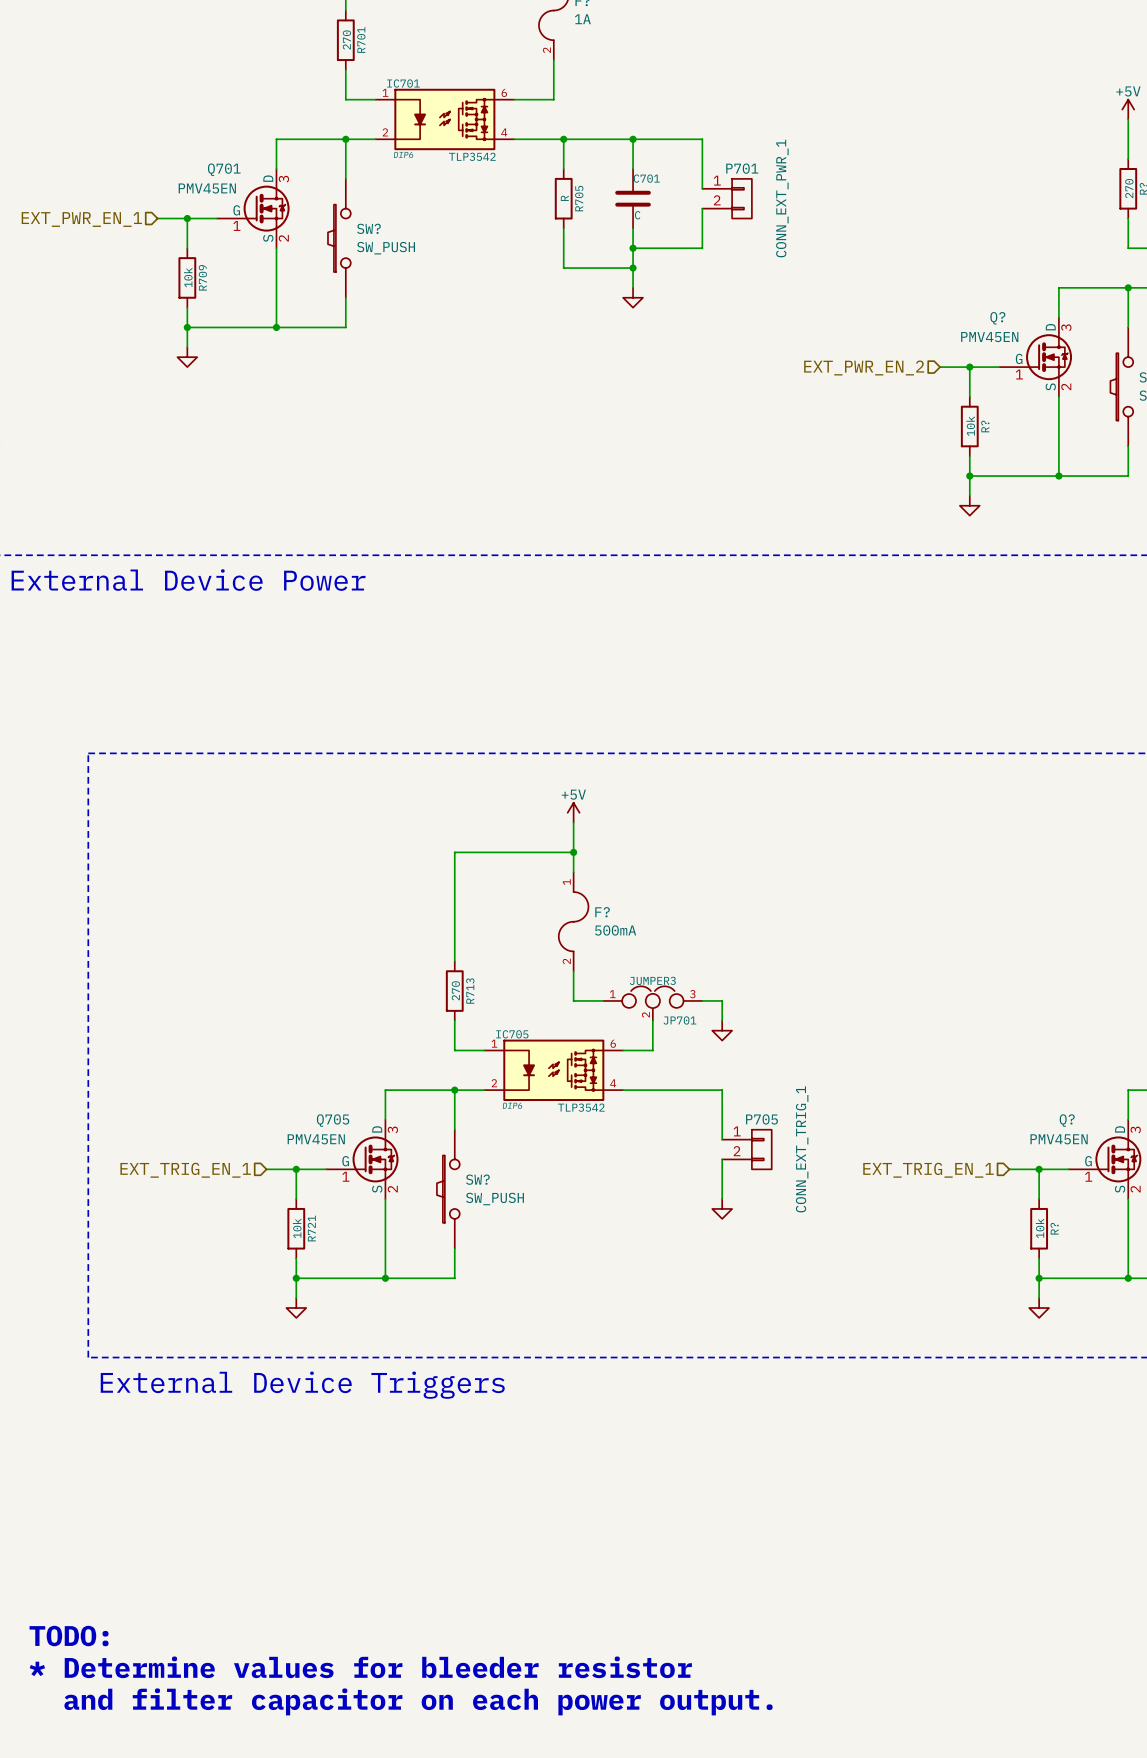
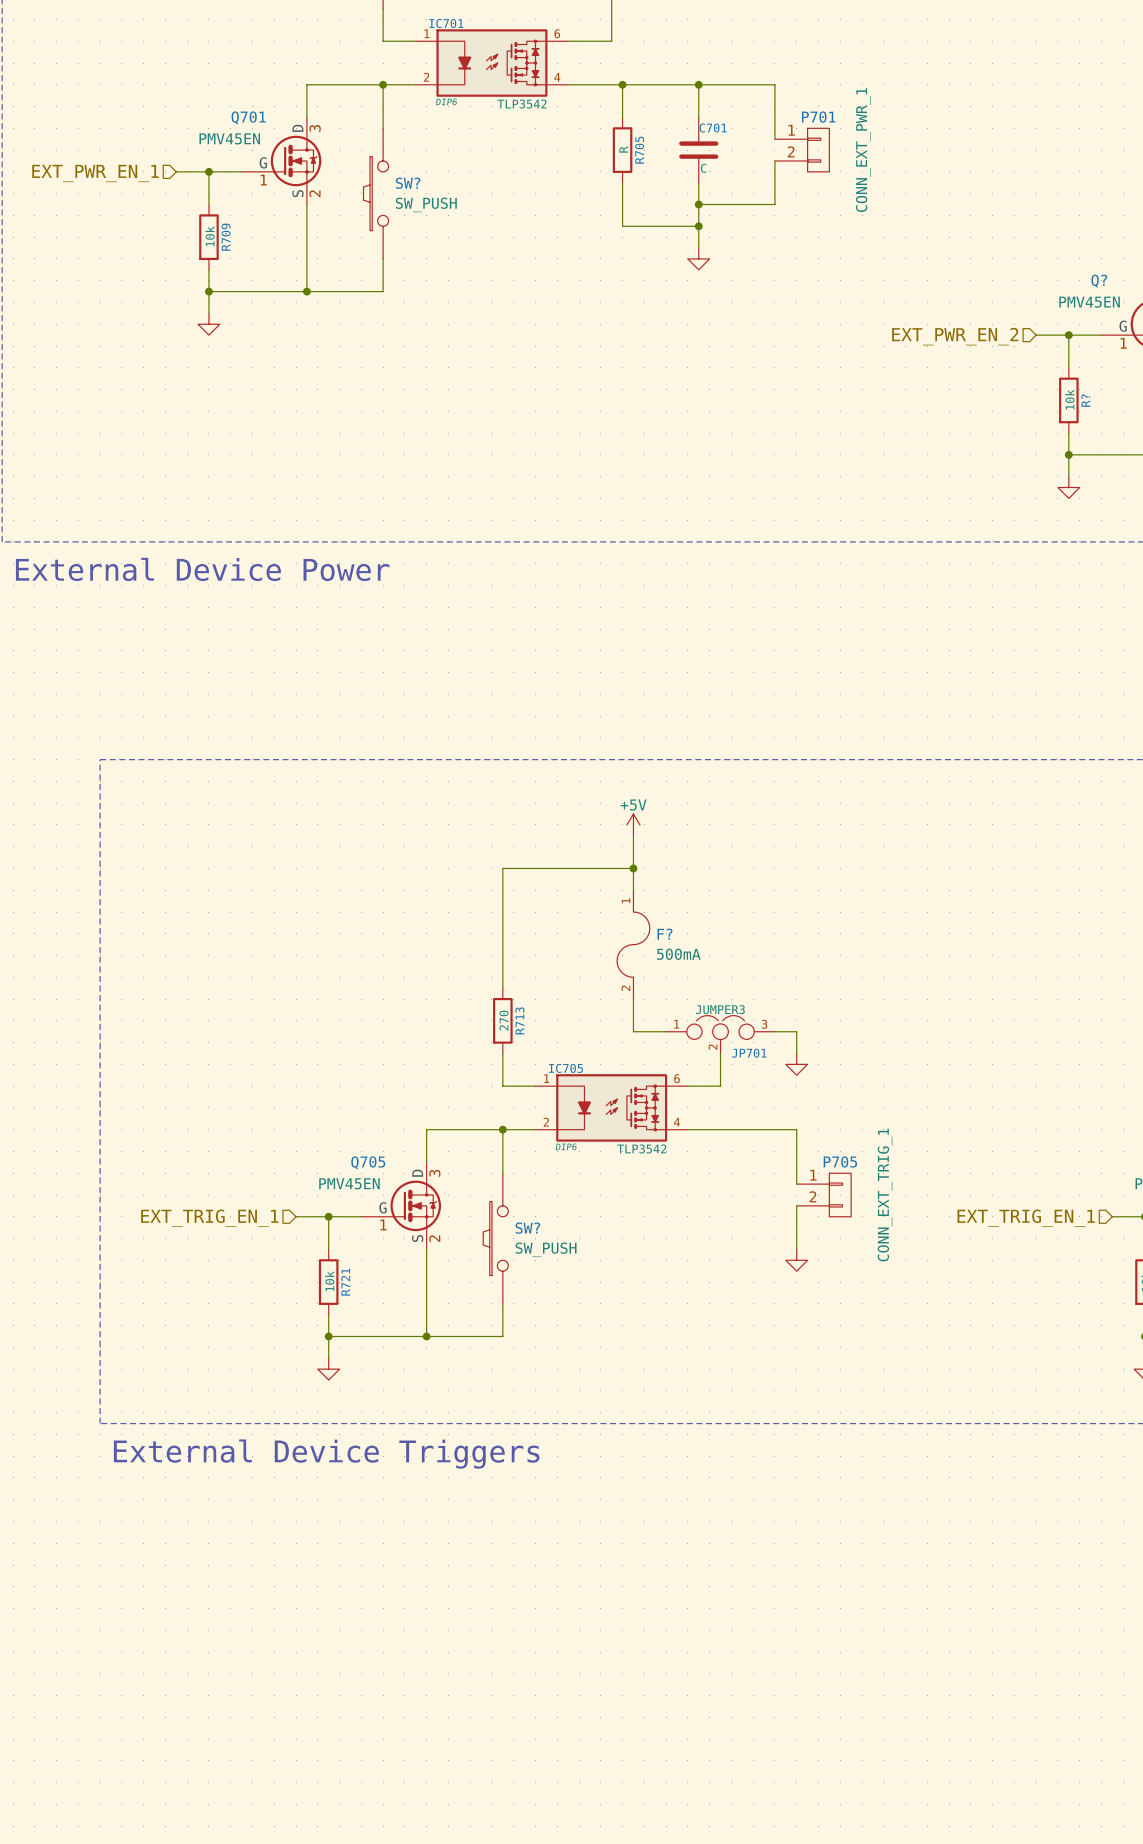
text: TODO: (69, 1636) -> none
text: * Determine values for bleeder resistor (360, 1667) -> none
text: and filter capacitor on each power output. (418, 1701) -> none

